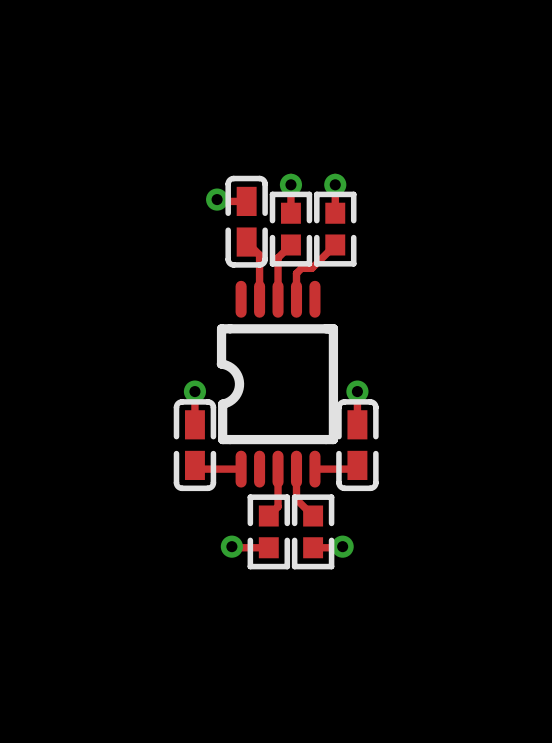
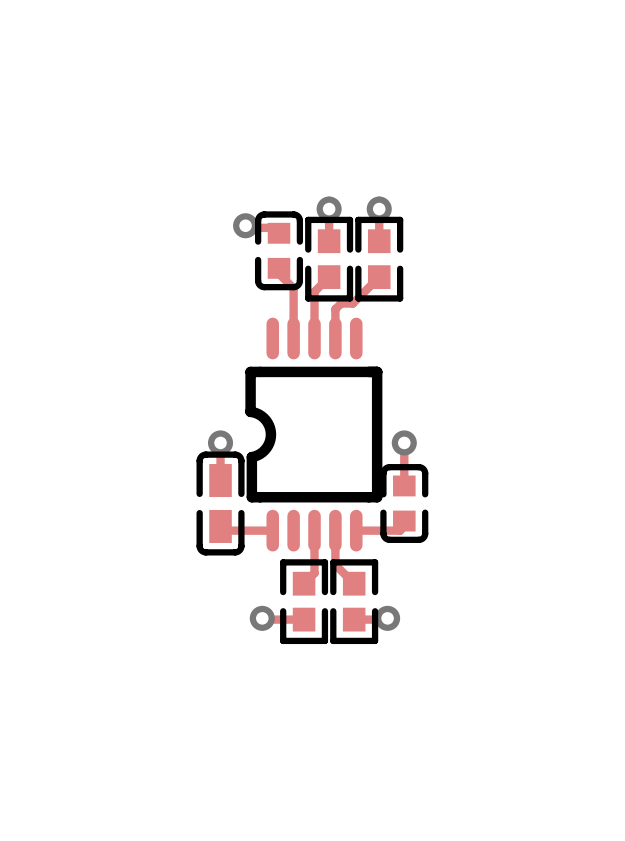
part footprint: [225, 175, 268, 268] -> [254, 211, 304, 291]
part footprint: [336, 399, 379, 492] -> [380, 464, 429, 543]

